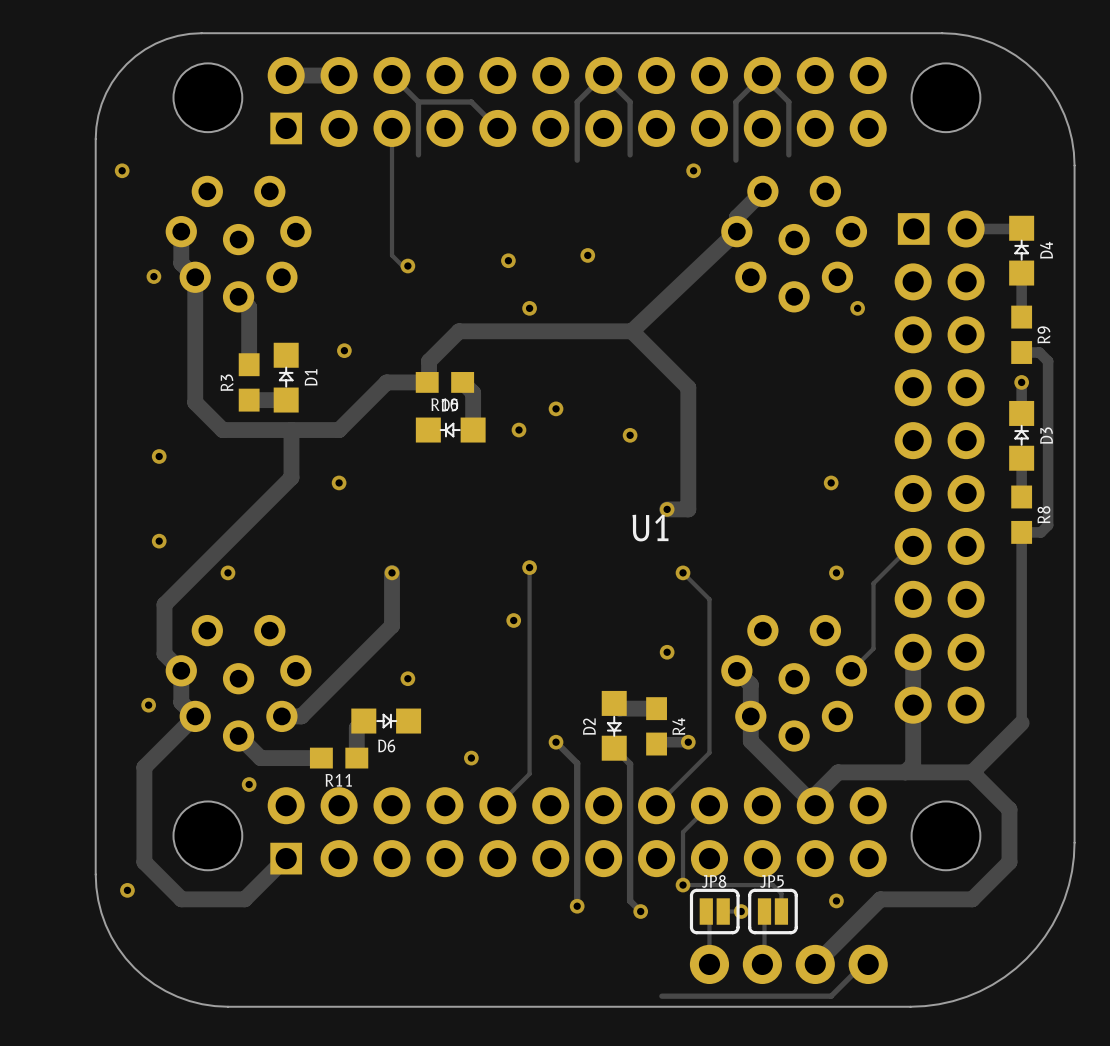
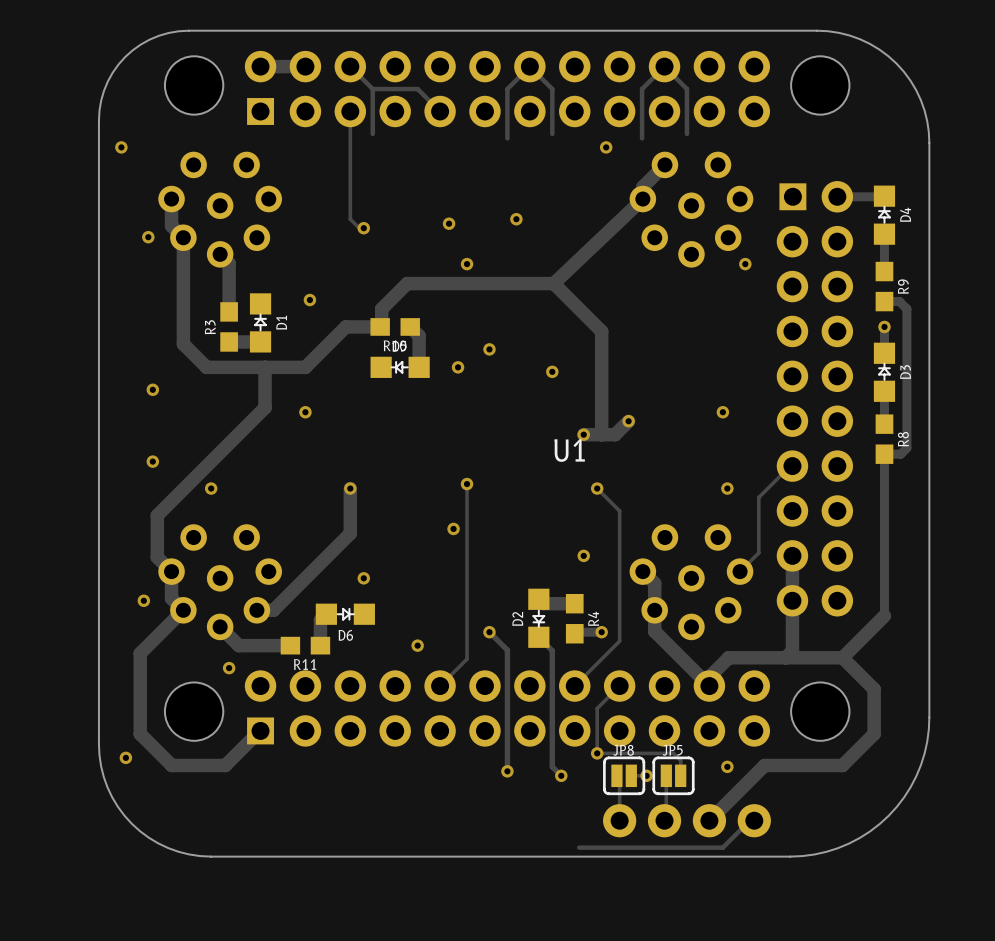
track: none -> (628, 421) (615, 434) (601, 434)
via: none -> (628, 421)

